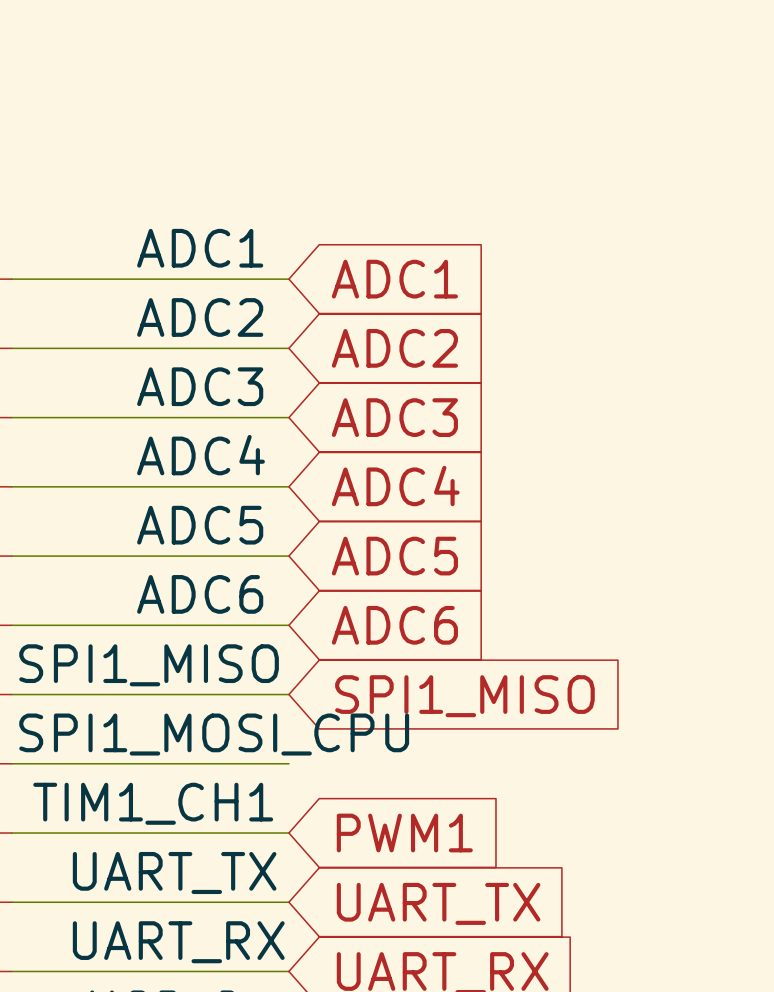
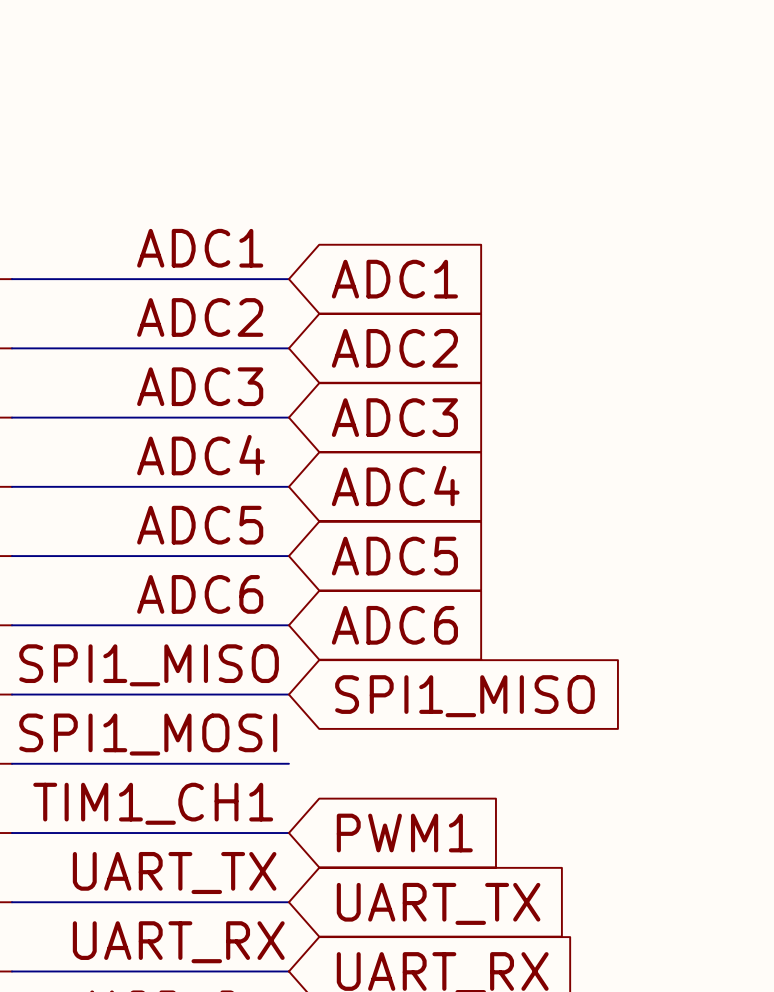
label: SPI1_MOSI_CPU (214, 734) -> SPI1_MOSI (148, 734)

